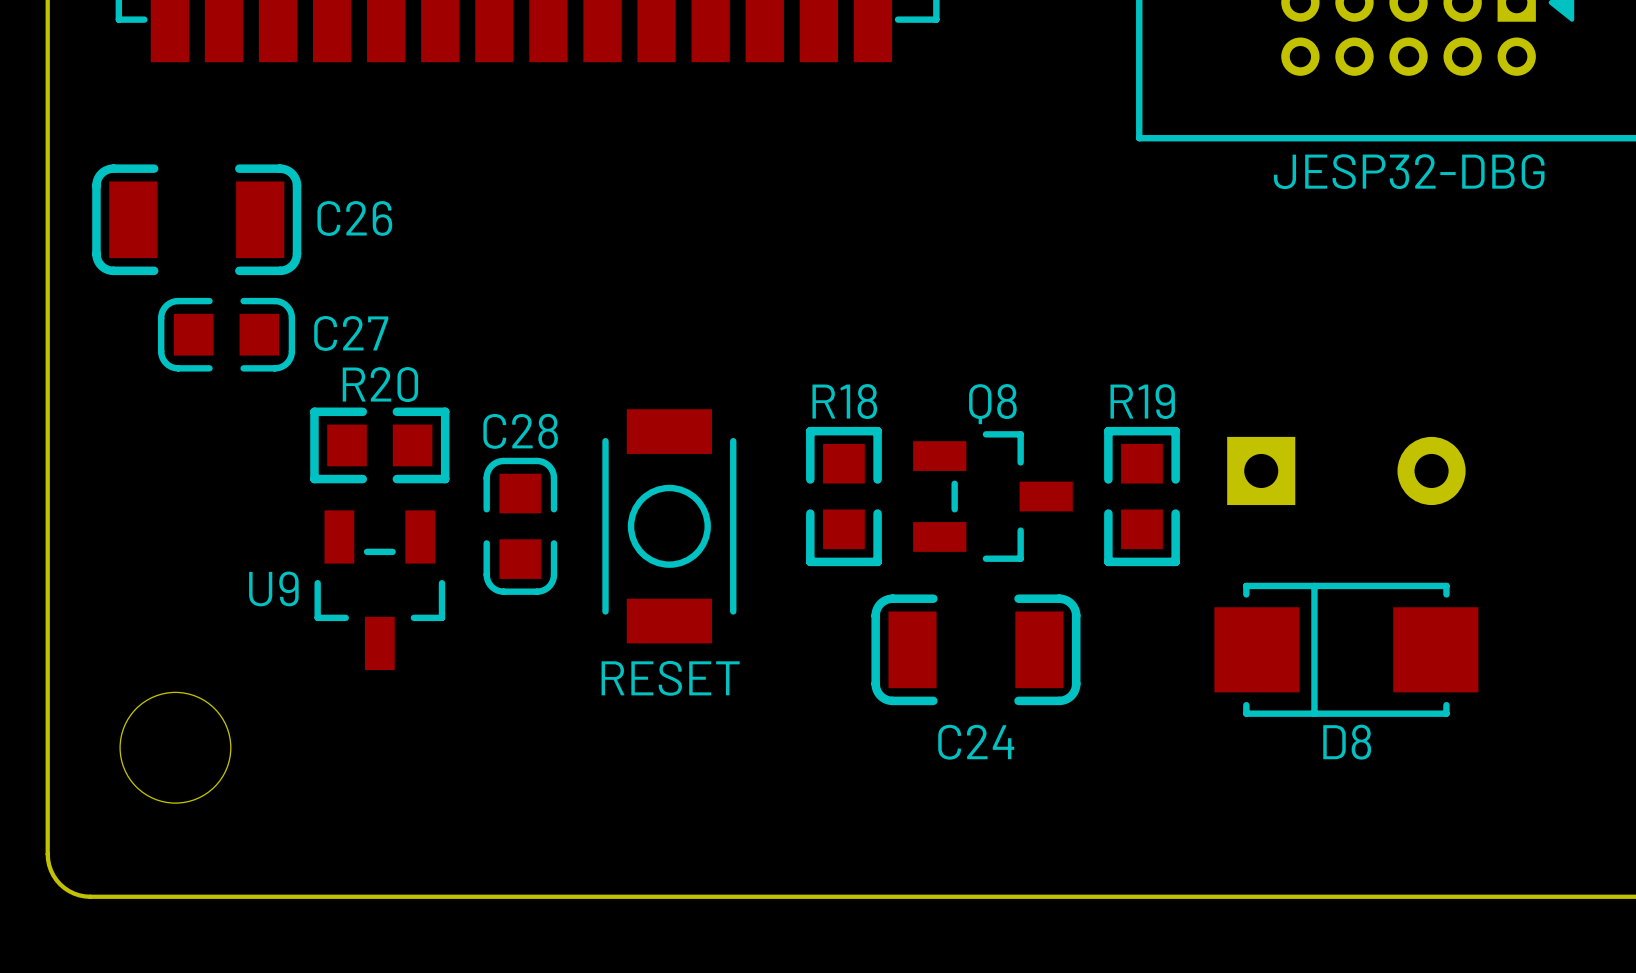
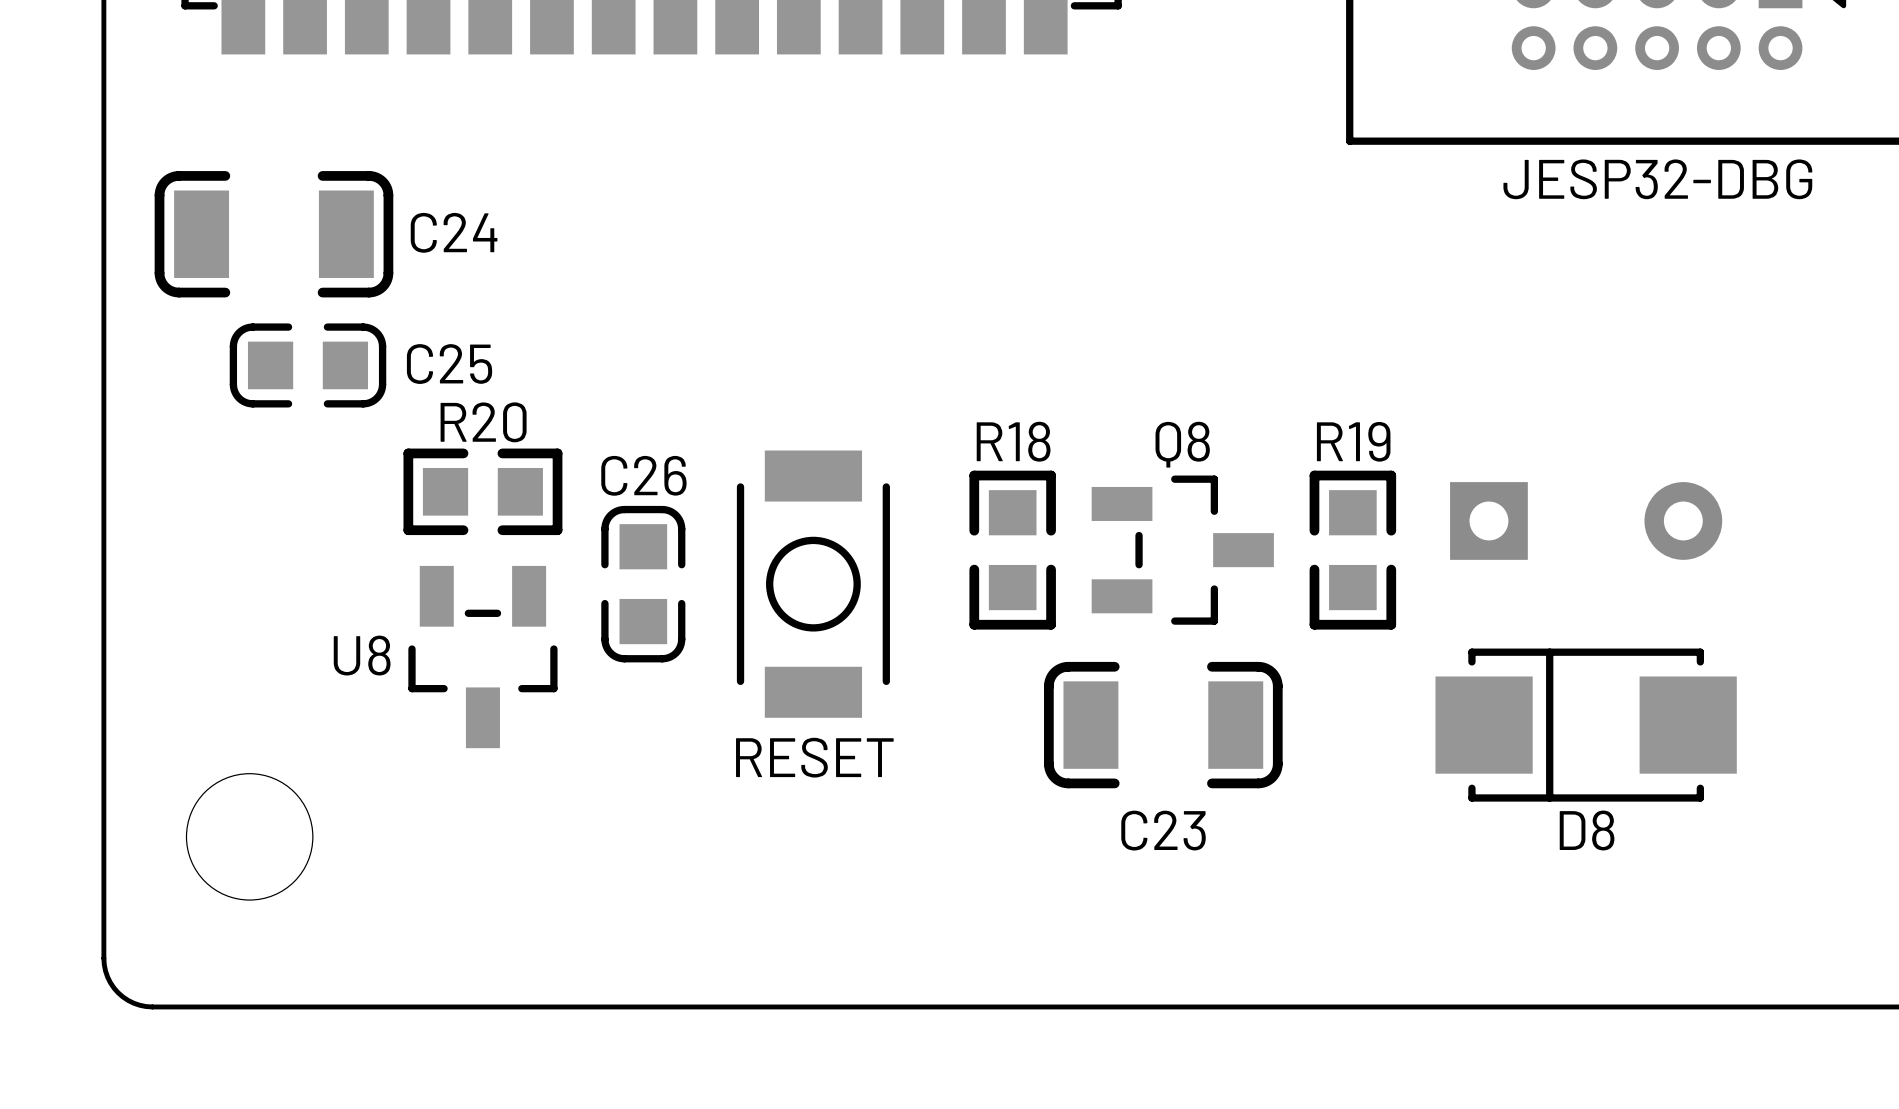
C26 name: C26 (354, 218) -> C24 (454, 232)
C27 name: C27 (351, 333) -> C25 (449, 364)
C28 name: C28 (520, 431) -> C26 (643, 475)
U9 name: U9 (273, 588) -> U8 (362, 655)
C24 name: C24 (976, 742) -> C23 (1163, 830)

